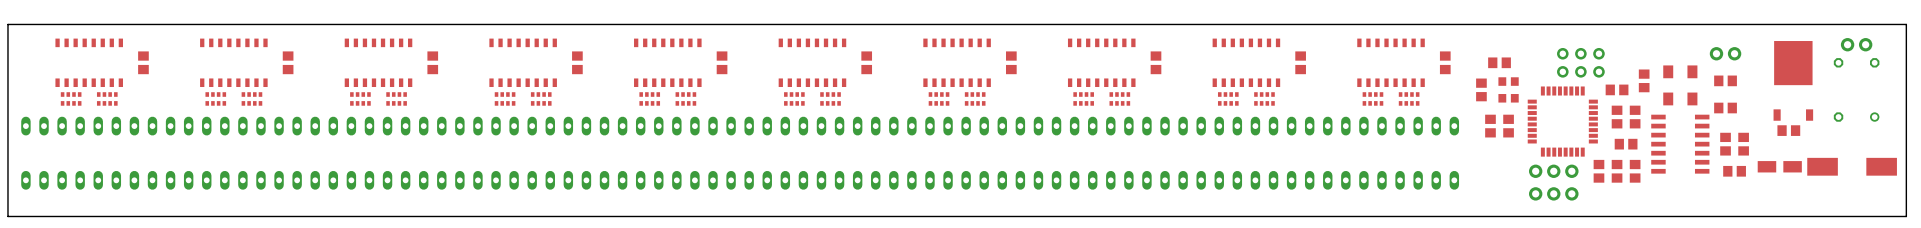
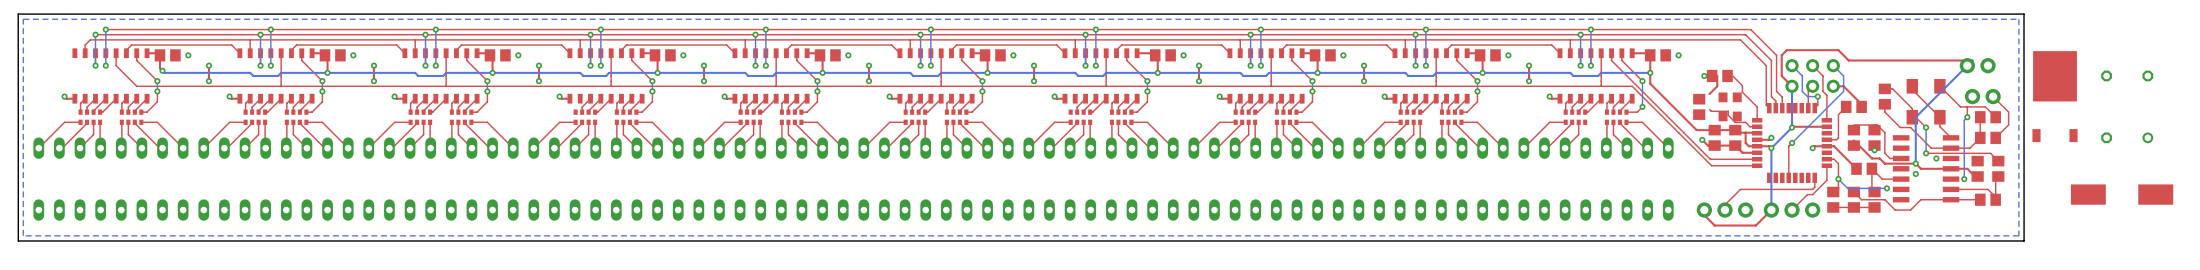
bottom zone outline: none -> (2018, 19) (2018, 235) (23, 235) (23, 19) (2018, 19)
top track: none -> (105, 29) (1750, 29) (1776, 55) (1776, 91) (1782, 97) (1782, 108)
bottom track: none -> (105, 29) (105, 65)
via: none -> (105, 29)
bottom track: none -> (270, 29) (270, 65)
via: none -> (270, 29)
bottom track: none -> (435, 29) (435, 65)
via: none -> (435, 29)
bottom track: none -> (600, 29) (600, 65)
via: none -> (600, 29)
bottom track: none -> (765, 29) (765, 65)
via: none -> (765, 29)
bottom track: none -> (930, 29) (930, 65)
via: none -> (930, 29)
bottom track: none -> (1095, 29) (1095, 65)
via: none -> (1095, 29)
bottom track: none -> (1260, 29) (1260, 65)
via: none -> (1260, 29)
bottom track: none -> (1425, 29) (1425, 65)
via: none -> (1425, 29)
bottom track: none -> (1590, 29) (1590, 65)
via: none -> (1590, 29)
board edge: (1906, 24) (7, 24) (7, 216) (1906, 216) (1906, 24) -> (2023, 14) (2024, 240) (18, 240) (18, 14) (2023, 14)
top track: none -> (95, 34) (1745, 34) (1771, 60) (1771, 96) (1775, 100) (1775, 108)
bottom track: none -> (95, 34) (95, 65)
via: none -> (95, 34)
bottom track: none -> (260, 34) (260, 65)
via: none -> (260, 34)
bottom track: none -> (425, 34) (425, 65)
via: none -> (425, 34)
bottom track: none -> (590, 34) (590, 65)
via: none -> (590, 34)
bottom track: none -> (755, 34) (755, 65)
via: none -> (755, 34)
bottom track: none -> (920, 34) (920, 65)
via: none -> (920, 34)
bottom track: none -> (1085, 34) (1085, 65)
via: none -> (1085, 34)
bottom track: none -> (1250, 34) (1250, 65)
via: none -> (1250, 34)
bottom track: none -> (1415, 34) (1415, 65)
via: none -> (1415, 34)
bottom track: none -> (1580, 34) (1580, 65)
via: none -> (1580, 34)
top track: none -> (250, 39) (250, 53)
top track: none -> (415, 39) (415, 53)
top track: none -> (580, 39) (580, 53)
top track: none -> (745, 39) (745, 53)
top track: none -> (910, 39) (910, 53)
top track: none -> (1075, 39) (1075, 53)
top track: none -> (1240, 39) (1240, 53)
top track: none -> (1405, 39) (1405, 53)
top track: none -> (1570, 39) (1570, 53)
top track: none -> (85, 53) (85, 45) (90, 39) (1740, 39) (1766, 65) (1766, 105) (1769, 108)
top track: none -> (116, 53) (116, 65) (136, 86) (1632, 86) (1711, 165) (1757, 165)
top track: none -> (136, 53) (136, 60) (157, 81)
top track: none -> (147, 53) (157, 53) (159, 55) (159, 68) (162, 70)
top track: none -> (239, 53) (231, 45) (131, 45) (126, 50) (126, 53)
top track: none -> (281, 53) (281, 86)
top track: none -> (301, 53) (301, 60) (322, 81)
top track: none -> (312, 53) (322, 53) (327, 57) (327, 72)
top track: none -> (404, 53) (396, 45) (296, 45) (291, 50) (291, 53)
top track: none -> (446, 53) (446, 86)
top track: none -> (466, 53) (466, 60) (487, 81)
top track: none -> (477, 53) (487, 53) (492, 57) (492, 72)
top track: none -> (569, 53) (561, 45) (461, 45) (456, 50) (456, 53)
top track: none -> (611, 53) (611, 86)
top track: none -> (631, 53) (631, 60) (652, 81)
top track: none -> (642, 53) (652, 53) (657, 57) (657, 72)
top track: none -> (734, 53) (726, 45) (626, 45) (621, 50) (621, 53)
top track: none -> (776, 53) (776, 86)
top track: none -> (796, 53) (796, 60) (817, 81)
top track: none -> (807, 53) (817, 53) (822, 57) (822, 72)
top track: none -> (899, 53) (891, 45) (791, 45) (786, 50) (786, 53)
top track: none -> (941, 53) (941, 86)
top track: none -> (961, 53) (961, 60) (982, 81)
top track: none -> (972, 53) (982, 53) (987, 57) (987, 72)
top track: none -> (1064, 53) (1056, 45) (956, 45) (951, 50) (951, 53)
top track: none -> (1106, 53) (1106, 86)
top track: none -> (1126, 53) (1126, 60) (1147, 81)
top track: none -> (1137, 53) (1153, 53) (1157, 57) (1157, 72)
top track: none -> (1229, 53) (1221, 45) (1121, 45) (1116, 50) (1116, 53)
top track: none -> (1271, 53) (1271, 86)
top track: none -> (1291, 53) (1291, 60) (1312, 81)
top track: none -> (1302, 53) (1312, 53) (1317, 57) (1317, 72)
top track: none -> (1394, 53) (1386, 45) (1286, 45) (1281, 50) (1281, 53)
top track: none -> (1436, 53) (1436, 86)
top track: none -> (1456, 53) (1456, 60) (1477, 81)
top track: none -> (1467, 53) (1477, 53) (1482, 57) (1482, 72)
top track: none -> (1559, 53) (1551, 45) (1451, 45) (1446, 50) (1446, 53)
top track: none -> (1601, 53) (1601, 86)
top track: none -> (1611, 53) (1611, 60) (1710, 159) (1757, 159)
top track: none -> (1621, 53) (1621, 60) (1642, 81)
top track: none -> (1632, 53) (1648, 53) (1650, 55) (1650, 83) (1696, 130) (1735, 130) (1737, 132) (1757, 133)
via: none -> (188, 55)
via: none -> (353, 55)
via: none -> (518, 55)
via: none -> (683, 55)
via: none -> (848, 55)
via: none -> (1013, 55)
via: none -> (1183, 55)
via: none -> (1343, 55)
via: none -> (1508, 55)
via: none -> (1678, 55)
part: (1856, 44) -> none
top track: none -> (1972, 60) (1848, 60) (1838, 50) (1786, 50) (1781, 55) (1781, 75) (1792, 86)
bottom track: none -> (1972, 60) (1915, 117) (1915, 163)
via: none -> (95, 65)
via: none -> (105, 65)
top track: none -> (208, 65) (208, 81)
via: none -> (208, 65)
via: none -> (260, 65)
via: none -> (270, 65)
top track: none -> (373, 65) (373, 81)
via: none -> (373, 65)
via: none -> (425, 65)
via: none -> (435, 65)
top track: none -> (538, 65) (538, 81)
via: none -> (538, 65)
via: none -> (590, 65)
via: none -> (600, 65)
top track: none -> (703, 65) (703, 81)
via: none -> (703, 65)
via: none -> (755, 65)
via: none -> (765, 65)
top track: none -> (868, 65) (868, 81)
via: none -> (868, 65)
via: none -> (920, 65)
via: none -> (930, 65)
top track: none -> (1034, 65) (1034, 81)
via: none -> (1034, 65)
via: none -> (1085, 65)
via: none -> (1095, 65)
top track: none -> (1199, 65) (1199, 81)
via: none -> (1199, 65)
via: none -> (1250, 65)
via: none -> (1260, 65)
top track: none -> (1364, 65) (1364, 81)
via: none -> (1364, 65)
via: none -> (1415, 65)
via: none -> (1425, 65)
top track: none -> (1529, 65) (1529, 81)
via: none -> (1529, 65)
via: none -> (1580, 65)
via: none -> (1590, 65)
bottom track: none -> (1792, 65) (1802, 75) (1802, 91) (1807, 96) (1817, 96)
top track: none -> (1812, 65) (1822, 75) (1822, 91) (1826, 95) (1826, 120)
bottom track: none -> (1833, 65) (1843, 75) (1843, 91) (1792, 143)
bottom track: none -> (162, 70) (164, 72) (250, 72) (253, 75) (278, 75) (281, 72) (415, 72) (418, 75) (443, 75) (446, 72) (580, 72) (583, 75) (606, 75) (609, 72) (745, 72) (748, 75) (773, 75) (776, 72) (910, 72) (913, 75) (938, 75) (941, 72) (1075, 72) (1078, 75) (1103, 75) (1106, 72) (1240, 72) (1243, 75) (1266, 75) (1269, 72) (1405, 72) (1408, 75) (1433, 75) (1436, 72) (1570, 72) (1573, 75) (1598, 75) (1601, 72) (1650, 72)
via: none -> (162, 70)
via: none -> (327, 72)
via: none -> (492, 72)
via: none -> (657, 72)
via: none -> (822, 72)
via: none -> (987, 72)
via: none -> (1157, 72)
via: none -> (1317, 72)
via: none -> (1482, 72)
via: none -> (1650, 72)
part rotation: 0° (143, 62) -> 90° clockwise (167, 55)
part position: (143, 62) -> (167, 55)
part rotation: 0° (288, 62) -> 90° clockwise (332, 55)
part position: (288, 62) -> (332, 55)
part rotation: 0° (432, 62) -> 90° clockwise (497, 55)
part position: (432, 62) -> (497, 55)
part rotation: 0° (577, 62) -> 90° clockwise (662, 55)
part position: (577, 62) -> (662, 55)
part rotation: 0° (722, 62) -> 90° clockwise (827, 55)
part position: (722, 62) -> (827, 55)
part rotation: 0° (866, 62) -> 90° clockwise (992, 55)
part position: (866, 62) -> (992, 55)
part rotation: 0° (1011, 62) -> 90° clockwise (1162, 55)
part position: (1011, 62) -> (1162, 55)
part rotation: 0° (1155, 62) -> 90° clockwise (1322, 55)
part position: (1155, 62) -> (1322, 55)
part rotation: 0° (1300, 62) -> 90° clockwise (1487, 55)
part position: (1300, 62) -> (1487, 55)
part rotation: 0° (1445, 62) -> 90° clockwise (1657, 55)
part position: (1445, 62) -> (1657, 55)
top track: none -> (1704, 75) (1717, 75) (1717, 86) (1709, 94)
via: none -> (1704, 75)
top track: none -> (1732, 75) (1742, 85) (1742, 92) (1757, 106) (1757, 120)
bottom track: none -> (157, 81) (157, 91)
via: none -> (157, 81)
via: none -> (208, 81)
bottom track: none -> (322, 81) (322, 91)
via: none -> (322, 81)
via: none -> (373, 81)
bottom track: none -> (487, 81) (487, 91)
via: none -> (487, 81)
via: none -> (538, 81)
bottom track: none -> (652, 81) (652, 91)
via: none -> (652, 81)
via: none -> (703, 81)
bottom track: none -> (817, 81) (817, 91)
via: none -> (817, 81)
via: none -> (868, 81)
bottom track: none -> (982, 81) (982, 91)
via: none -> (982, 81)
via: none -> (1034, 81)
bottom track: none -> (1147, 81) (1147, 91)
via: none -> (1147, 81)
via: none -> (1199, 81)
bottom track: none -> (1312, 81) (1312, 91)
via: none -> (1312, 81)
via: none -> (1364, 81)
bottom track: none -> (1477, 81) (1477, 91)
via: none -> (1477, 81)
via: none -> (1529, 81)
bottom track: none -> (1642, 81) (1642, 106)
via: none -> (1642, 81)
bottom track: none -> (1792, 86) (1792, 127) (1771, 148) (1771, 210)
top track: none -> (1812, 86) (1808, 90) (1808, 108)
top track: none -> (1833, 86) (1843, 86) (1861, 104) (1861, 106)
top track: none -> (1912, 86) (1912, 89) (1939, 117) (1939, 126) (1951, 137)
top track: none -> (1939, 86) (1960, 106) (1985, 106) (1995, 117)
top track: none -> (1884, 88) (1892, 88) (1912, 108) (1912, 117) (1915, 117) (1926, 127)
part footprint: [1714, 75, 1737, 87] -> [1964, 88, 2001, 105]
top track: none -> (157, 91) (157, 101) (146, 112) (141, 112)
via: none -> (157, 91)
top track: none -> (322, 91) (322, 101) (312, 112) (306, 112)
via: none -> (322, 91)
top track: none -> (487, 91) (487, 101) (477, 112) (471, 112)
via: none -> (487, 91)
top track: none -> (652, 91) (652, 101) (642, 112) (636, 112)
via: none -> (652, 91)
top track: none -> (817, 91) (817, 101) (807, 112) (801, 112)
via: none -> (817, 91)
top track: none -> (982, 91) (982, 101) (972, 112) (966, 112)
via: none -> (982, 91)
top track: none -> (1147, 91) (1147, 101) (1137, 112) (1131, 112)
via: none -> (1147, 91)
top track: none -> (1312, 91) (1312, 101) (1302, 112) (1296, 112)
via: none -> (1312, 91)
top track: none -> (1477, 91) (1477, 101) (1467, 112) (1461, 112)
via: none -> (1477, 91)
top track: none -> (64, 96) (66, 98) (74, 98)
via: none -> (64, 96)
top track: none -> (229, 96) (231, 98) (239, 98)
via: none -> (229, 96)
top track: none -> (394, 96) (396, 98) (404, 98)
via: none -> (394, 96)
top track: none -> (559, 96) (561, 98) (569, 98)
via: none -> (559, 96)
top track: none -> (724, 96) (726, 98) (734, 98)
via: none -> (724, 96)
top track: none -> (889, 96) (891, 98) (899, 98)
via: none -> (889, 96)
top track: none -> (1054, 96) (1056, 98) (1064, 98)
via: none -> (1054, 96)
top track: none -> (1219, 96) (1221, 98) (1229, 98)
via: none -> (1219, 96)
top track: none -> (1384, 96) (1386, 98) (1394, 98)
via: none -> (1384, 96)
top track: none -> (1549, 96) (1551, 98) (1559, 98)
via: none -> (1549, 96)
top track: none -> (1817, 96) (1817, 105) (1814, 108)
via: none -> (1817, 96)
top track: none -> (1993, 96) (2008, 112) (2008, 124) (1995, 137)
top track: none -> (85, 98) (80, 103) (80, 112)
top track: none -> (95, 98) (87, 107) (87, 112)
top track: none -> (105, 98) (93, 112)
top track: none -> (116, 98) (102, 112) (100, 112)
top track: none -> (126, 98) (121, 103) (121, 112)
top track: none -> (136, 98) (128, 107) (128, 112)
top track: none -> (147, 98) (134, 112)
top track: none -> (250, 98) (245, 103) (245, 112)
top track: none -> (260, 98) (252, 107) (252, 112)
top track: none -> (270, 98) (258, 112)
top track: none -> (281, 98) (267, 112) (265, 112)
top track: none -> (291, 98) (286, 103) (286, 112)
top track: none -> (301, 98) (293, 107) (293, 112)
top track: none -> (312, 98) (299, 112)
top track: none -> (415, 98) (410, 103) (410, 112)
top track: none -> (425, 98) (417, 107) (417, 112)
top track: none -> (435, 98) (423, 112)
top track: none -> (446, 98) (432, 112) (430, 112)
top track: none -> (456, 98) (451, 103) (451, 112)
top track: none -> (466, 98) (458, 107) (458, 112)
top track: none -> (477, 98) (464, 112)
top track: none -> (590, 98) (582, 107) (582, 112)
top track: none -> (600, 98) (588, 112)
top track: none -> (611, 98) (597, 112) (595, 112)
top track: none -> (621, 98) (616, 103) (616, 112)
top track: none -> (631, 98) (623, 107) (623, 112)
top track: none -> (642, 98) (629, 112)
top track: none -> (745, 98) (740, 103) (740, 112)
top track: none -> (755, 98) (747, 107) (747, 112)
top track: none -> (765, 98) (753, 112)
top track: none -> (776, 98) (762, 112) (760, 112)
top track: none -> (786, 98) (781, 103) (781, 112)
top track: none -> (796, 98) (788, 107) (788, 112)
top track: none -> (807, 98) (794, 112)
top track: none -> (910, 98) (905, 103) (905, 112)
top track: none -> (920, 98) (912, 107) (912, 112)
top track: none -> (930, 98) (918, 112)
top track: none -> (941, 98) (927, 112) (925, 112)
top track: none -> (951, 98) (946, 103) (946, 112)
top track: none -> (961, 98) (953, 107) (953, 112)
top track: none -> (972, 98) (959, 112)
top track: none -> (1085, 98) (1077, 107) (1077, 112)
top track: none -> (1095, 98) (1083, 112)
top track: none -> (1106, 98) (1092, 112) (1090, 112)
top track: none -> (1116, 98) (1111, 103) (1111, 112)
top track: none -> (1126, 98) (1118, 107) (1118, 112)
top track: none -> (1137, 98) (1124, 112)
top track: none -> (1240, 98) (1235, 103) (1235, 112)
top track: none -> (1250, 98) (1242, 107) (1242, 112)
top track: none -> (1260, 98) (1248, 112)
top track: none -> (1271, 98) (1257, 112) (1255, 112)
top track: none -> (1281, 98) (1276, 103) (1276, 112)
top track: none -> (1291, 98) (1283, 107) (1283, 112)
top track: none -> (1302, 98) (1289, 112)
top track: none -> (1405, 98) (1400, 103) (1400, 112)
top track: none -> (1415, 98) (1407, 107) (1407, 112)
top track: none -> (1425, 98) (1413, 112)
top track: none -> (1436, 98) (1422, 112) (1420, 112)
top track: none -> (1446, 98) (1441, 103) (1441, 112)
top track: none -> (1456, 98) (1448, 107) (1448, 112)
top track: none -> (1467, 98) (1454, 112)
top track: none -> (1570, 98) (1565, 103) (1565, 112)
top track: none -> (1580, 98) (1572, 107) (1572, 112)
top track: none -> (1590, 98) (1578, 112)
top track: none -> (1601, 98) (1587, 112) (1585, 112)
top track: none -> (1611, 98) (1606, 103) (1606, 112)
top track: none -> (1621, 98) (1613, 107) (1613, 112)
top track: none -> (1632, 98) (1619, 112)
top track: none -> (1884, 104) (1884, 112) (1900, 127) (1910, 127) (1931, 148) (1969, 148) (1980, 137) (1980, 117)
top track: none -> (1642, 106) (1637, 112) (1626, 112)
via: none -> (1642, 106)
top track: none -> (1846, 106) (1838, 114) (1838, 137) (1836, 139) (1826, 139)
top track: none -> (1967, 106) (1967, 117)
top track: none -> (1709, 109) (1711, 111) (1728, 111) (1728, 115) (1735, 122) (1745, 122) (1750, 126) (1757, 126)
bottom track: none -> (1967, 117) (1964, 120) (1964, 179)
via: none -> (1967, 117)
part: none -> (1987, 117)
top track: none -> (80, 122) (64, 122) (38, 148)
top track: none -> (87, 122) (62, 148) (59, 148)
top track: none -> (93, 122) (93, 134) (80, 148)
top track: none -> (100, 122) (100, 148)
top track: none -> (121, 122) (121, 148)
top track: none -> (128, 122) (128, 134) (141, 148)
top track: none -> (134, 122) (159, 148) (162, 148)
top track: none -> (141, 122) (157, 122) (183, 148)
top track: none -> (245, 122) (229, 122) (203, 148)
top track: none -> (252, 122) (227, 148) (224, 148)
top track: none -> (258, 122) (258, 134) (245, 148)
top track: none -> (265, 122) (265, 148)
top track: none -> (286, 122) (286, 148)
top track: none -> (293, 122) (293, 134) (306, 148)
top track: none -> (299, 122) (324, 148) (327, 148)
top track: none -> (306, 122) (322, 122) (348, 148)
top track: none -> (410, 122) (394, 122) (368, 148)
top track: none -> (417, 122) (392, 148) (389, 148)
top track: none -> (423, 122) (423, 134) (410, 148)
top track: none -> (430, 122) (430, 148)
top track: none -> (451, 122) (451, 148)
top track: none -> (458, 122) (458, 134) (471, 148)
top track: none -> (464, 122) (489, 148) (492, 148)
top track: none -> (471, 122) (487, 122) (513, 148)
top track: none -> (575, 122) (559, 122) (533, 148)
top track: none -> (582, 122) (557, 148) (554, 148)
top track: none -> (588, 122) (588, 134) (575, 148)
top track: none -> (595, 122) (595, 148)
top track: none -> (616, 122) (616, 148)
top track: none -> (623, 122) (623, 134) (636, 148)
top track: none -> (629, 122) (654, 148) (657, 148)
top track: none -> (636, 122) (652, 122) (678, 148)
top track: none -> (740, 122) (724, 122) (698, 148)
top track: none -> (747, 122) (722, 148) (719, 148)
top track: none -> (753, 122) (753, 134) (740, 148)
top track: none -> (760, 122) (760, 148)
top track: none -> (781, 122) (781, 148)
top track: none -> (788, 122) (788, 134) (801, 148)
top track: none -> (794, 122) (819, 148) (822, 148)
top track: none -> (801, 122) (817, 122) (843, 148)
top track: none -> (905, 122) (889, 122) (863, 148)
top track: none -> (912, 122) (887, 148) (884, 148)
top track: none -> (918, 122) (918, 134) (905, 148)
top track: none -> (925, 122) (925, 148)
top track: none -> (946, 122) (946, 148)
top track: none -> (953, 122) (953, 134) (966, 148)
top track: none -> (959, 122) (984, 148) (987, 148)
top track: none -> (966, 122) (982, 122) (1008, 148)
top track: none -> (1070, 122) (1054, 122) (1028, 148)
top track: none -> (1077, 122) (1052, 148) (1049, 148)
top track: none -> (1083, 122) (1083, 134) (1070, 148)
top track: none -> (1090, 122) (1090, 148)
top track: none -> (1111, 122) (1111, 148)
top track: none -> (1118, 122) (1118, 134) (1131, 148)
top track: none -> (1124, 122) (1149, 148) (1152, 148)
top track: none -> (1131, 122) (1147, 122) (1173, 148)
top track: none -> (1235, 122) (1219, 122) (1193, 148)
top track: none -> (1242, 122) (1217, 148) (1214, 148)
top track: none -> (1248, 122) (1248, 134) (1235, 148)
top track: none -> (1255, 122) (1255, 148)
top track: none -> (1276, 122) (1276, 148)
top track: none -> (1283, 122) (1283, 134) (1296, 148)
top track: none -> (1289, 122) (1314, 148) (1317, 148)
top track: none -> (1296, 122) (1312, 122) (1338, 148)
top track: none -> (1400, 122) (1384, 122) (1358, 148)
top track: none -> (1407, 122) (1382, 148) (1379, 148)
top track: none -> (1413, 122) (1413, 134) (1400, 148)
top track: none -> (1420, 122) (1420, 148)
top track: none -> (1441, 122) (1441, 148)
top track: none -> (1448, 122) (1448, 134) (1462, 148)
top track: none -> (1454, 122) (1479, 148) (1482, 148)
top track: none -> (1461, 122) (1477, 122) (1503, 148)
top track: none -> (1565, 122) (1549, 122) (1523, 148)
top track: none -> (1572, 122) (1547, 148) (1544, 148)
top track: none -> (1578, 122) (1578, 134) (1565, 148)
top track: none -> (1606, 122) (1606, 148)
top track: none -> (1613, 122) (1613, 134) (1627, 148)
top track: none -> (1619, 122) (1644, 148) (1647, 148)
top track: none -> (1626, 122) (1642, 122) (1668, 148)
top track: none -> (1853, 124) (1877, 124) (1884, 132) (1884, 153) (1890, 158) (1901, 158)
top track: none -> (1826, 126) (1792, 127)
via: none -> (1792, 127)
bottom track: none -> (1926, 127) (1926, 153)
via: none -> (1926, 127)
part: (1725, 108) -> none
top track: none -> (1745, 132) (1745, 143) (1748, 146) (1769, 146) (1771, 148)
part: none -> (1714, 137)
part: none -> (1735, 137)
top track: none -> (1771, 137) (1769, 139) (1757, 139)
via: none -> (1771, 137)
part: none -> (1987, 137)
top track: none -> (1702, 139) (1707, 145) (1735, 145) (1742, 152) (1757, 152)
via: none -> (1702, 139)
top track: none -> (1853, 140) (1871, 158) (1879, 158) (1884, 163) (1915, 163) (1920, 168) (1967, 168) (1975, 176) (1977, 176)
top track: none -> (1792, 143) (1788, 146) (1788, 177)
via: none -> (1792, 143)
part: (1490, 126) -> none
part: (1508, 126) -> none
via: none -> (1771, 148)
top track: none -> (1812, 148) (1814, 146) (1833, 146) (1856, 168)
via: none -> (1812, 148)
via: none -> (1874, 150)
top track: none -> (1926, 153) (1990, 153) (1998, 161)
via: none -> (1926, 153)
part: (1788, 130) -> none
top track: none -> (1826, 159) (1834, 159) (1838, 163) (1838, 189) (1833, 192)
via: none -> (1936, 158)
via: none -> (1915, 163)
top track: none -> (1826, 165) (1826, 180) (1812, 194) (1807, 194) (1792, 210)
via: none -> (1915, 173)
top track: none -> (1998, 176) (1995, 179) (1995, 199)
top track: none -> (1814, 177) (1814, 187) (1812, 189) (1740, 189) (1724, 204) (1724, 210)
bottom track: none -> (1838, 179) (1847, 188) (1886, 188)
via: none -> (1838, 179)
top track: none -> (1901, 179) (1882, 179) (1871, 168) (1871, 189) (1874, 192)
via: none -> (1964, 179)
via: none -> (1886, 188)
top track: none -> (1951, 189) (1987, 189) (1995, 197)
top track: none -> (1853, 192) (1861, 199) (1884, 199) (1895, 210) (1910, 210) (1920, 199) (1980, 199)
part: (1779, 166) -> none
part: (1553, 171) -> none
top track: none -> (1874, 207) (1833, 207)
part: none -> (1724, 210)
top track: none -> (1771, 210) (1755, 225) (1714, 225) (1704, 215) (1704, 210)
part: none -> (1792, 210)
part: (1553, 193) -> none

